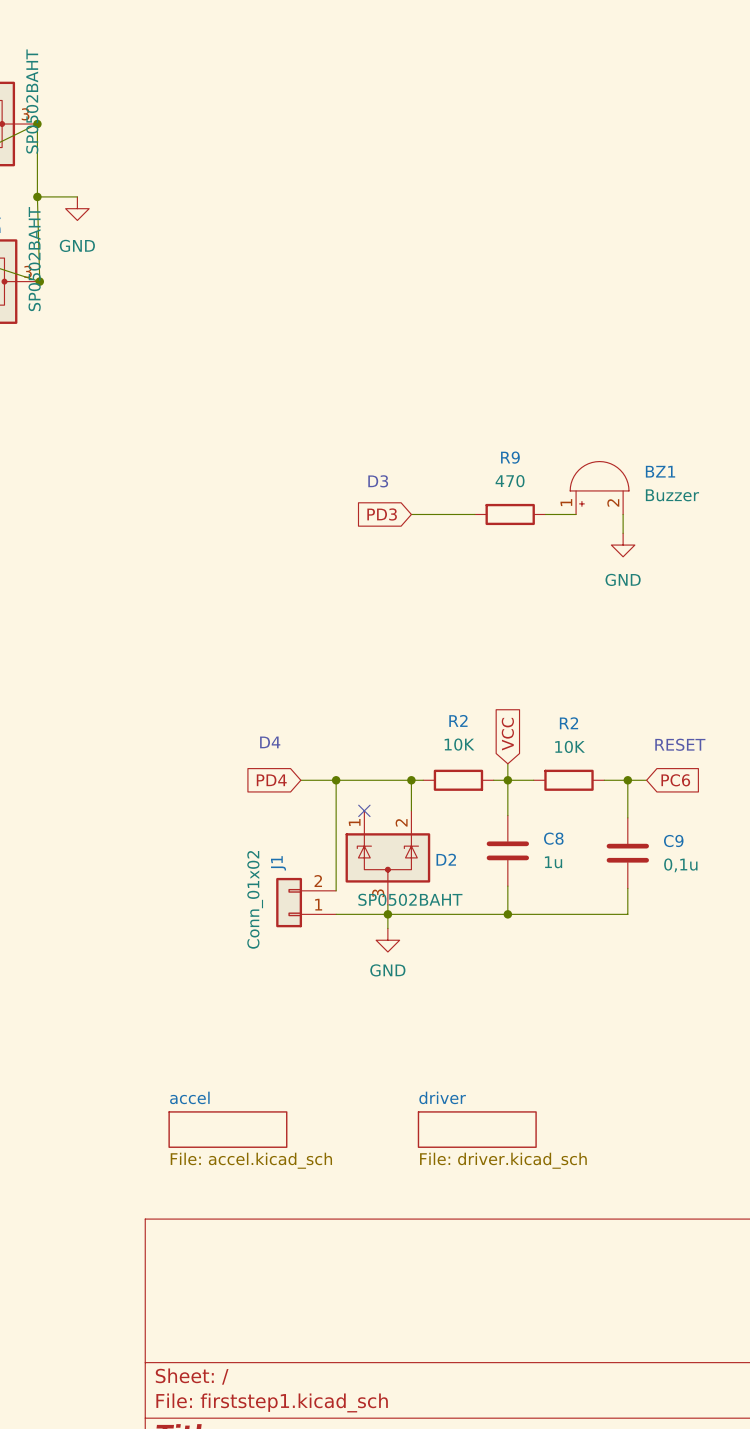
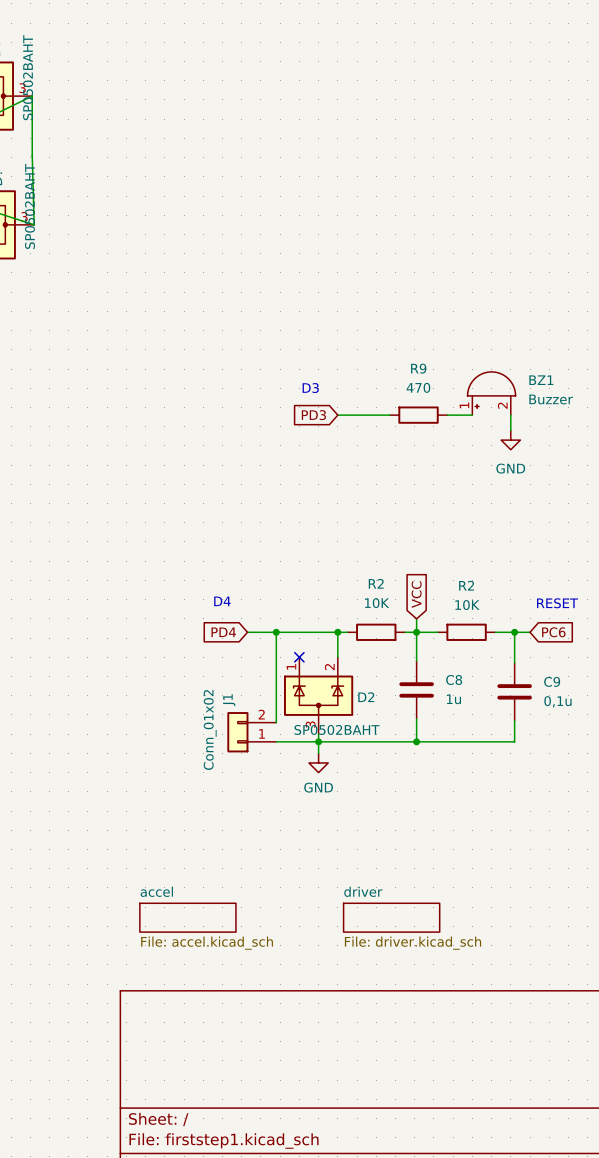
junction: (37, 124) -> none
wire: (37, 196) (77, 196) -> none
junction: (37, 196) -> none
power symbol: GND (77, 208) -> none
junction: (39, 281) -> none

